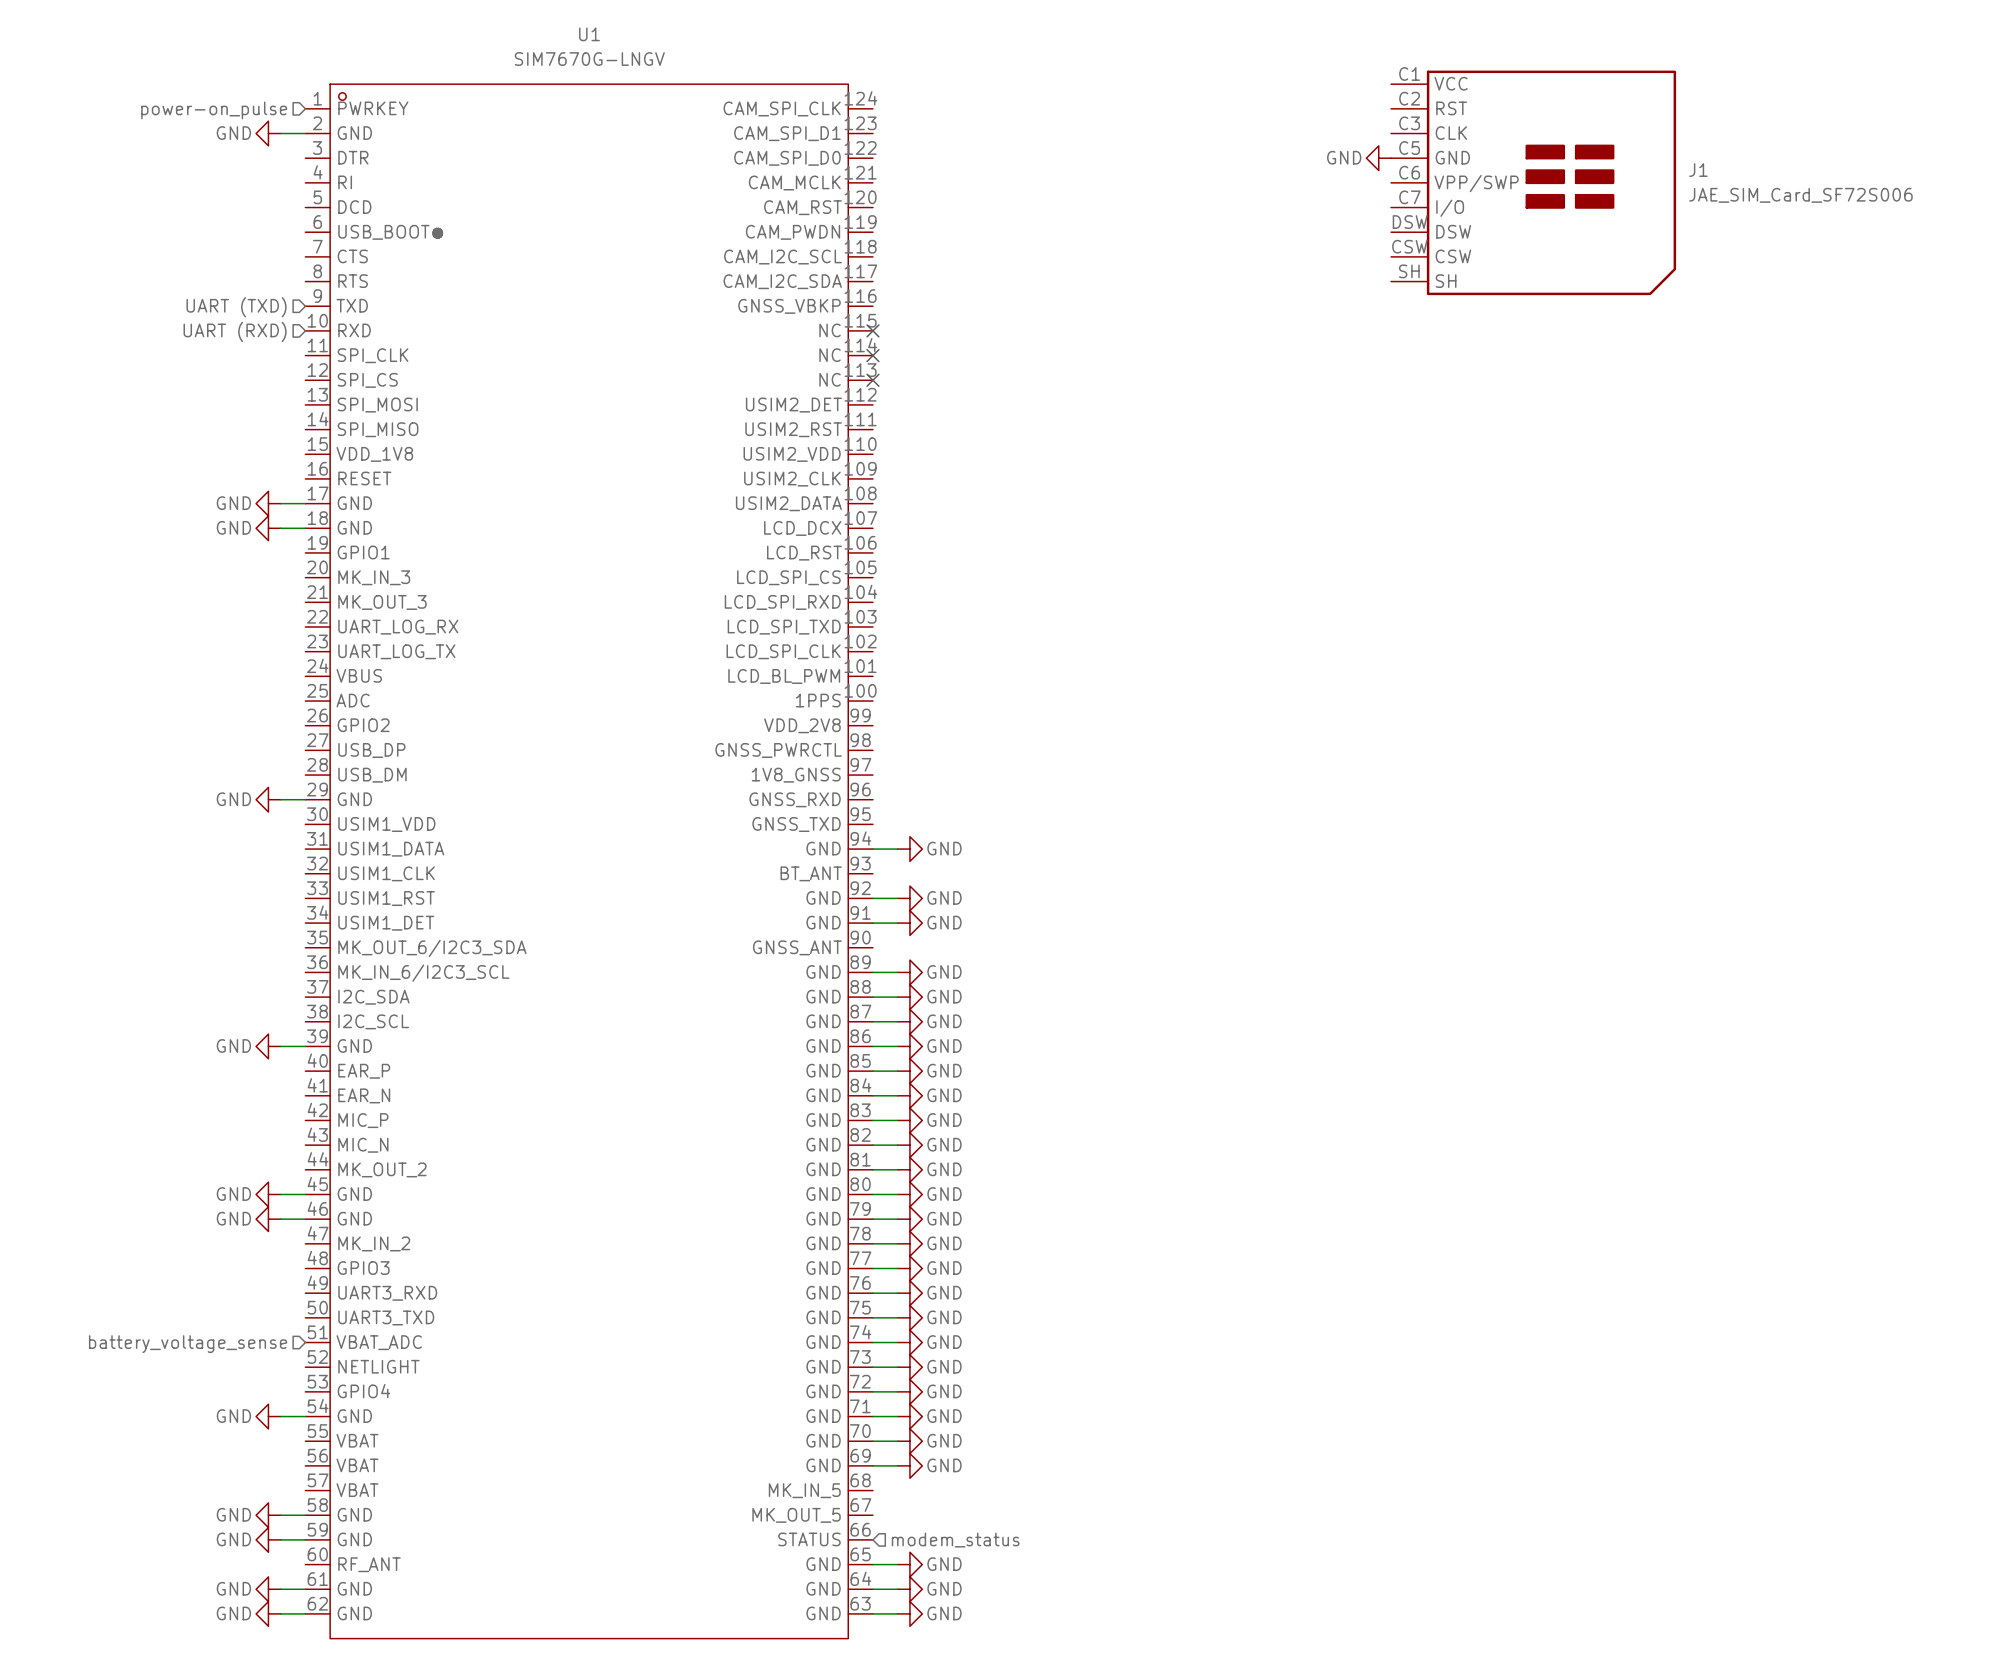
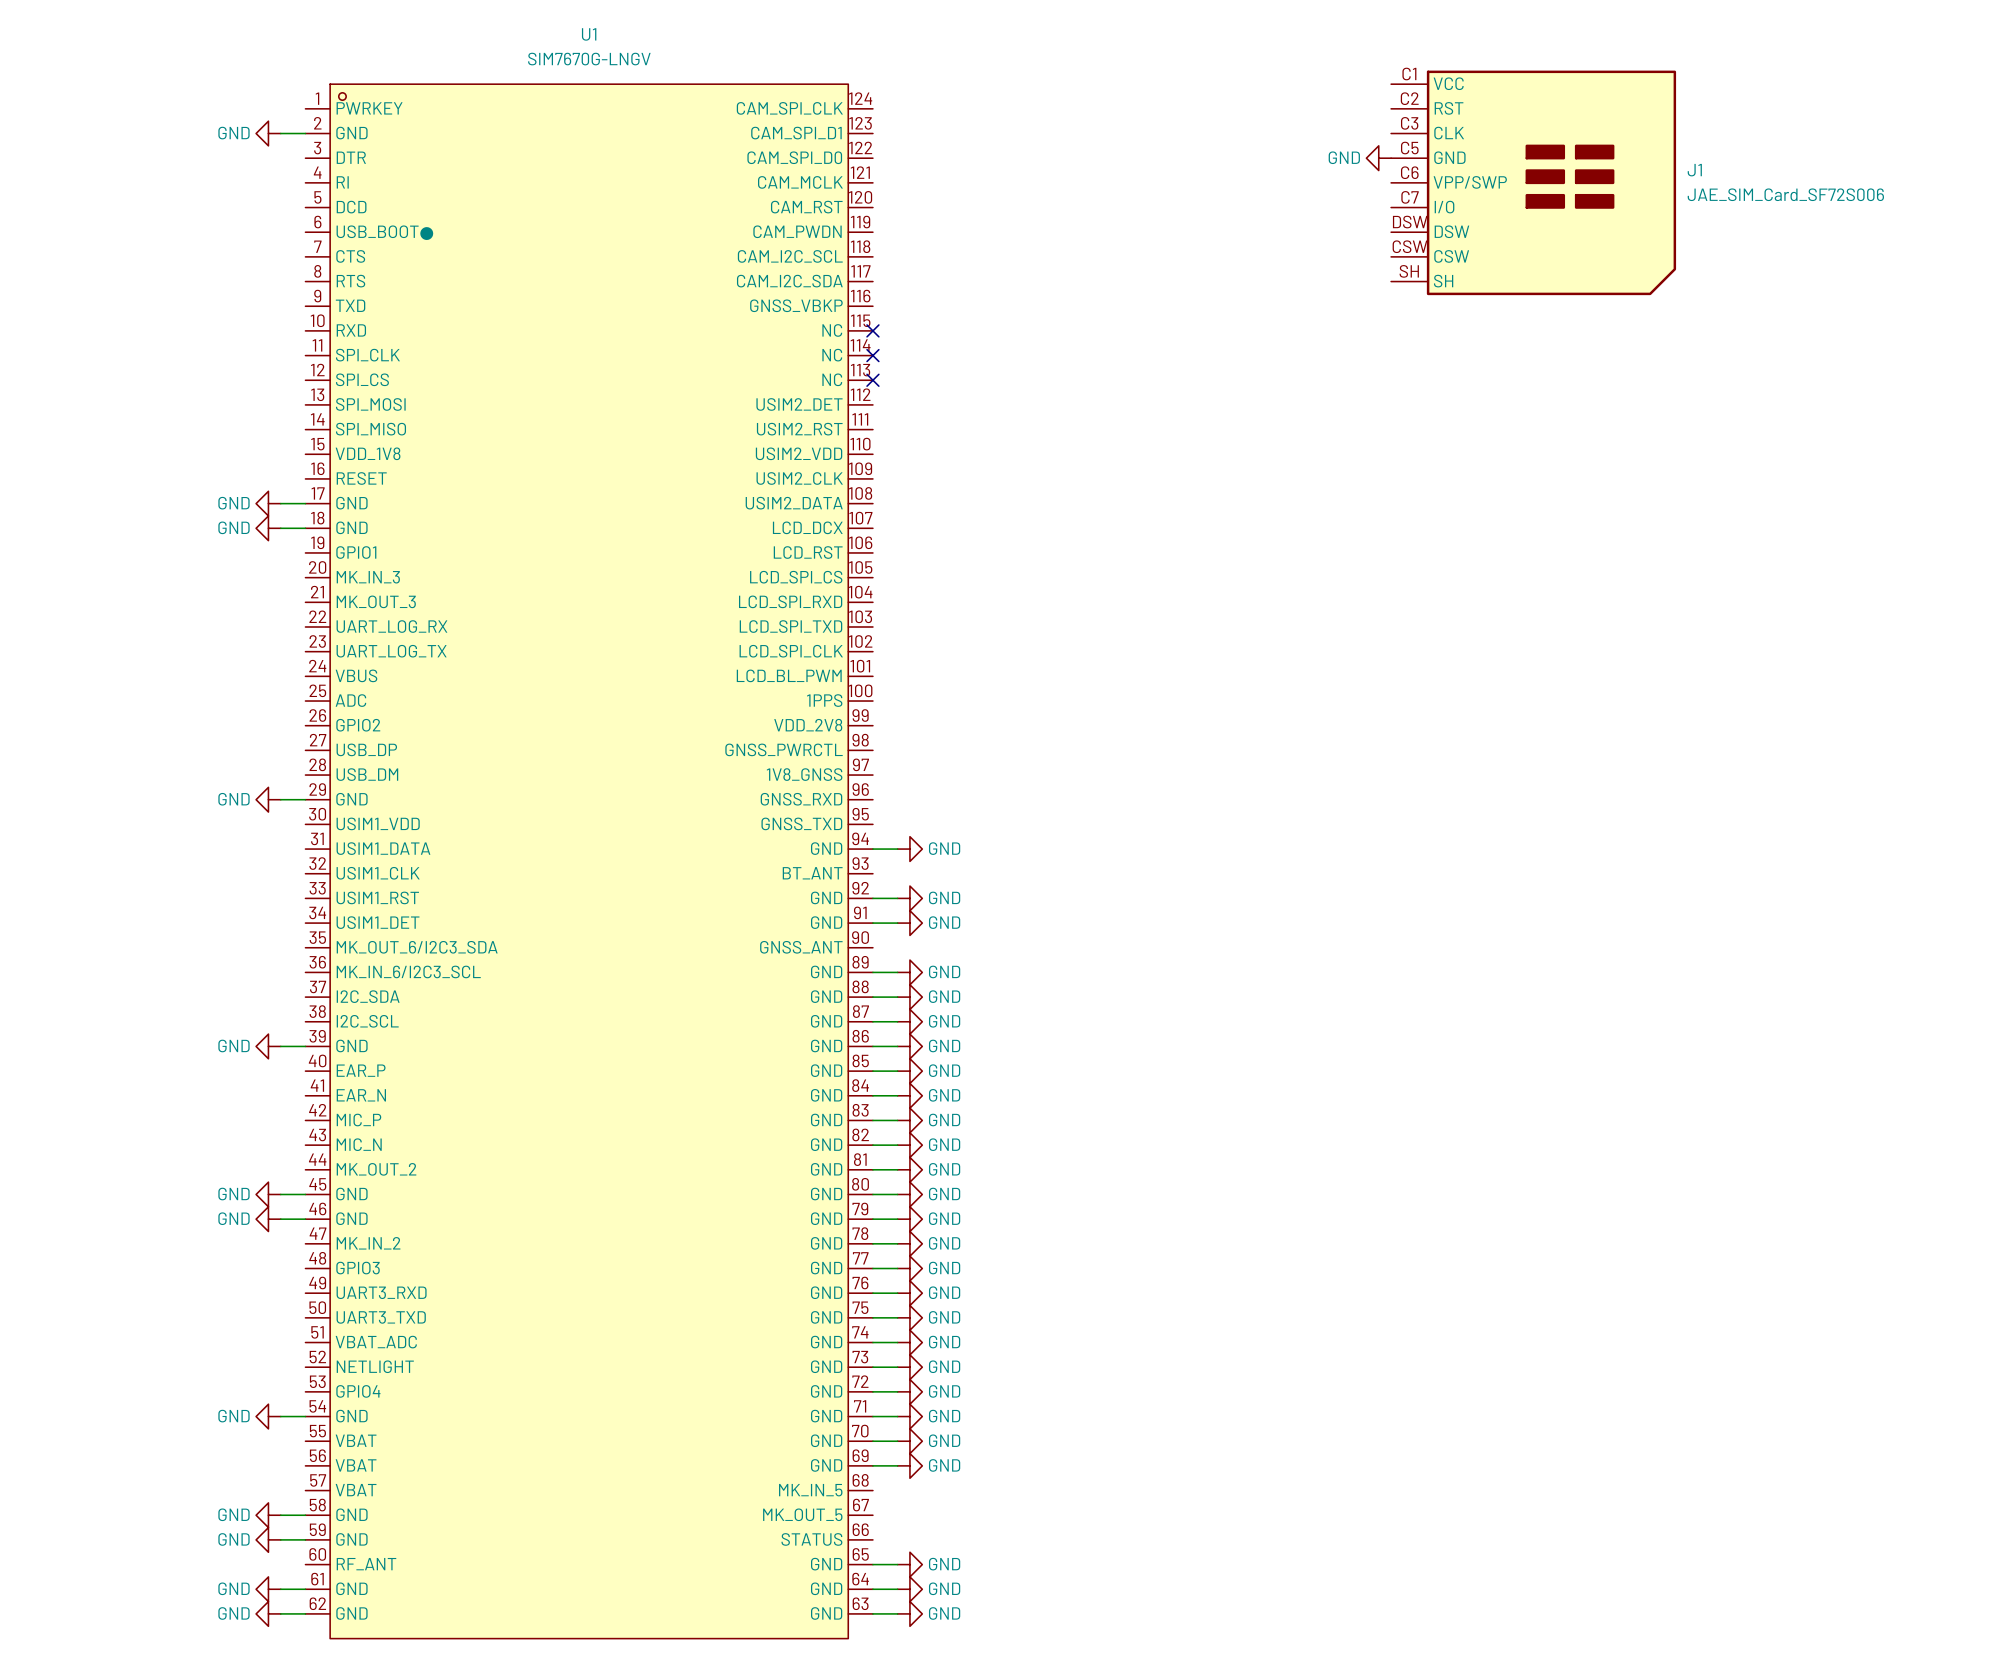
hierarchical label: power-on_pulse (214, 110) -> none
hierarchical label: UART (TXD) (236, 307) -> none
hierarchical label: UART (RXD) (235, 331) -> none
hierarchical label: battery_voltage_sense (188, 1344) -> none
hierarchical label: modem_status (955, 1540) -> none

